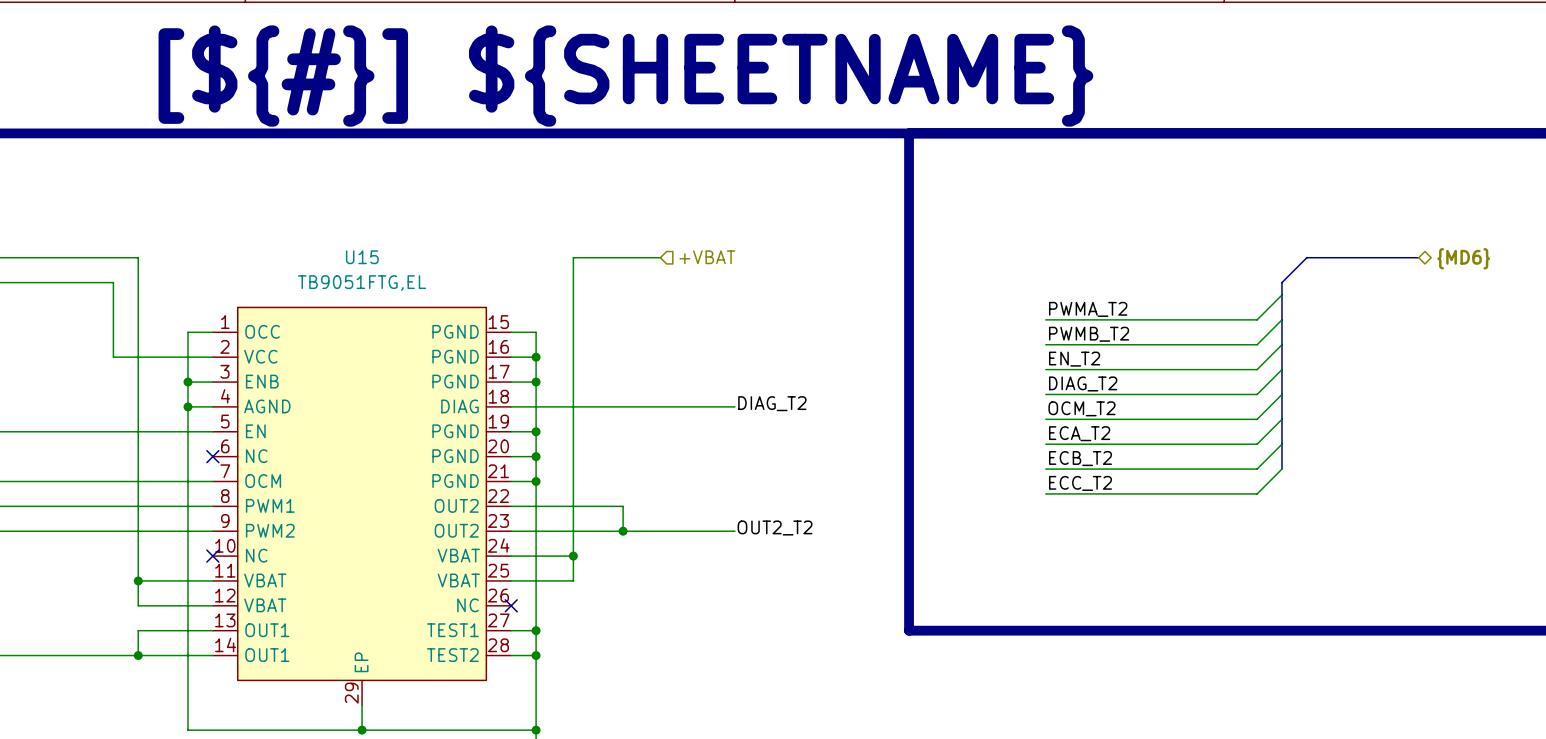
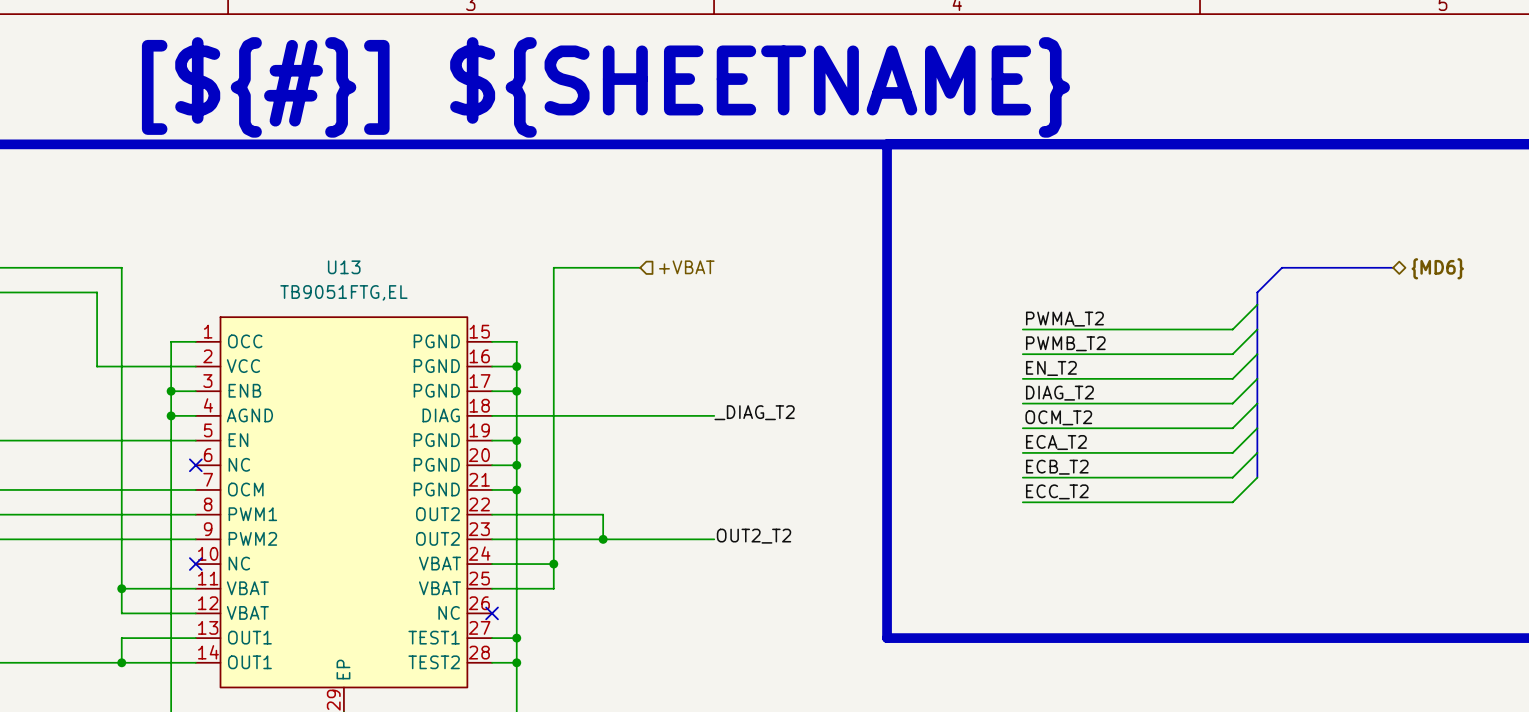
U15 name: U15 (362, 257) -> U13 (344, 267)
label: DIAG_T2 (772, 403) -> _DIAG_T2 (754, 412)

